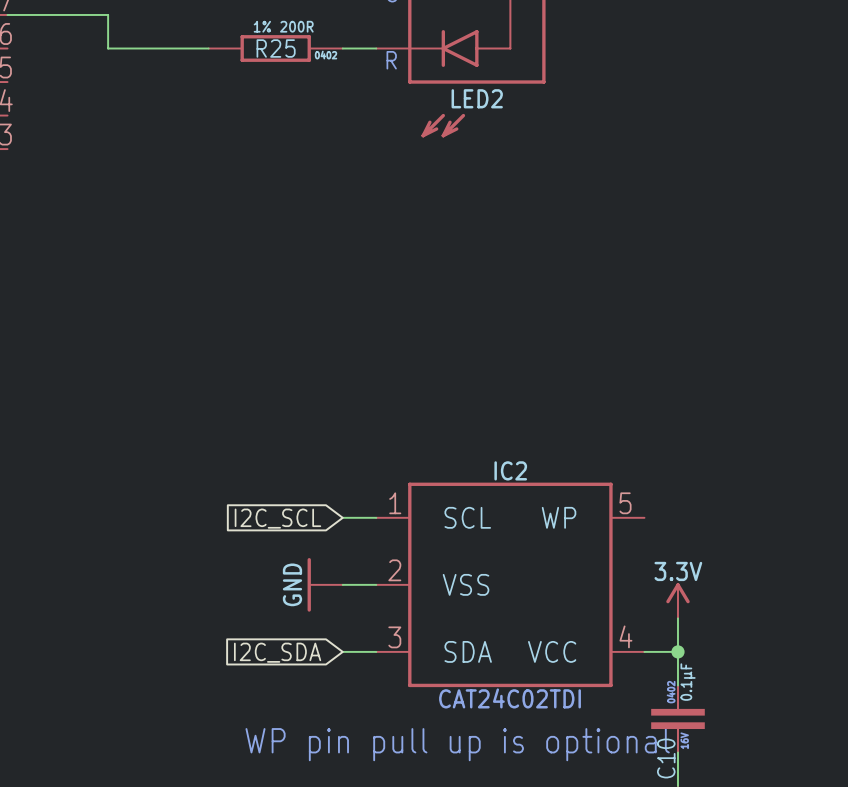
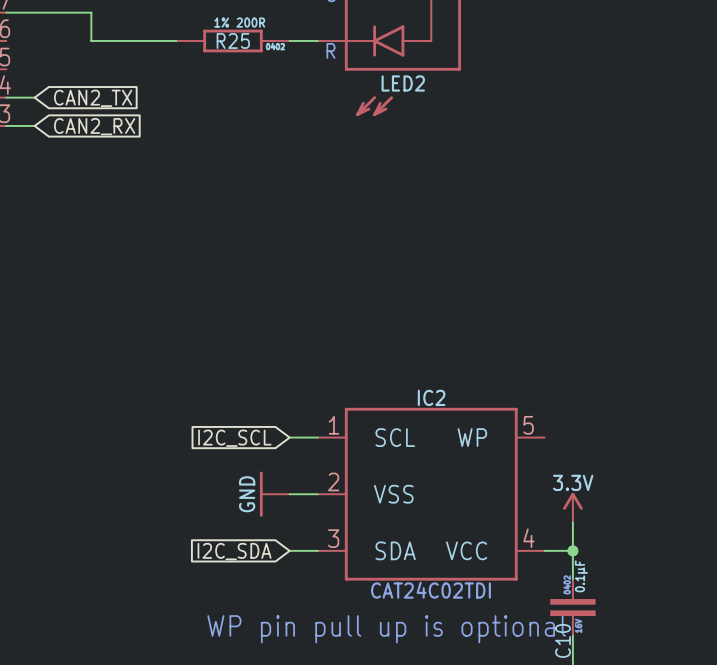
wire: none -> (6, 97) (34, 97)
global label: none -> CAN2_TX (93, 98)
wire: none -> (6, 125) (34, 125)
global label: none -> CAN2_RX (94, 126)

